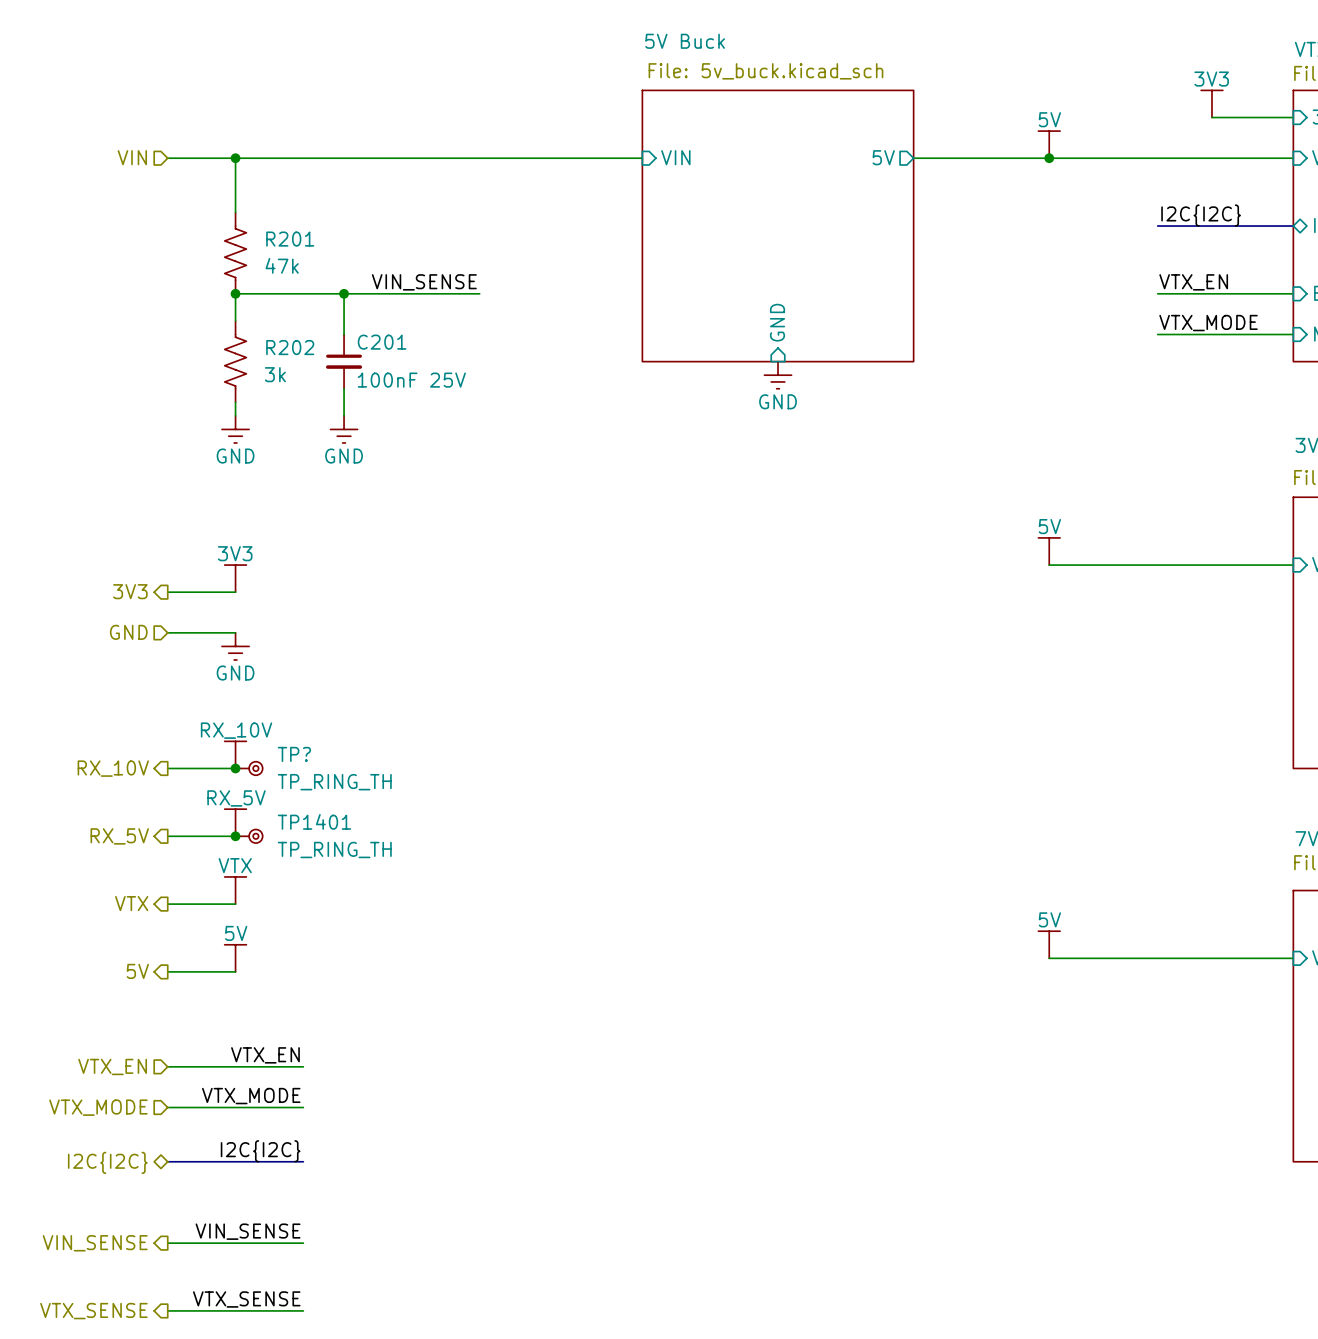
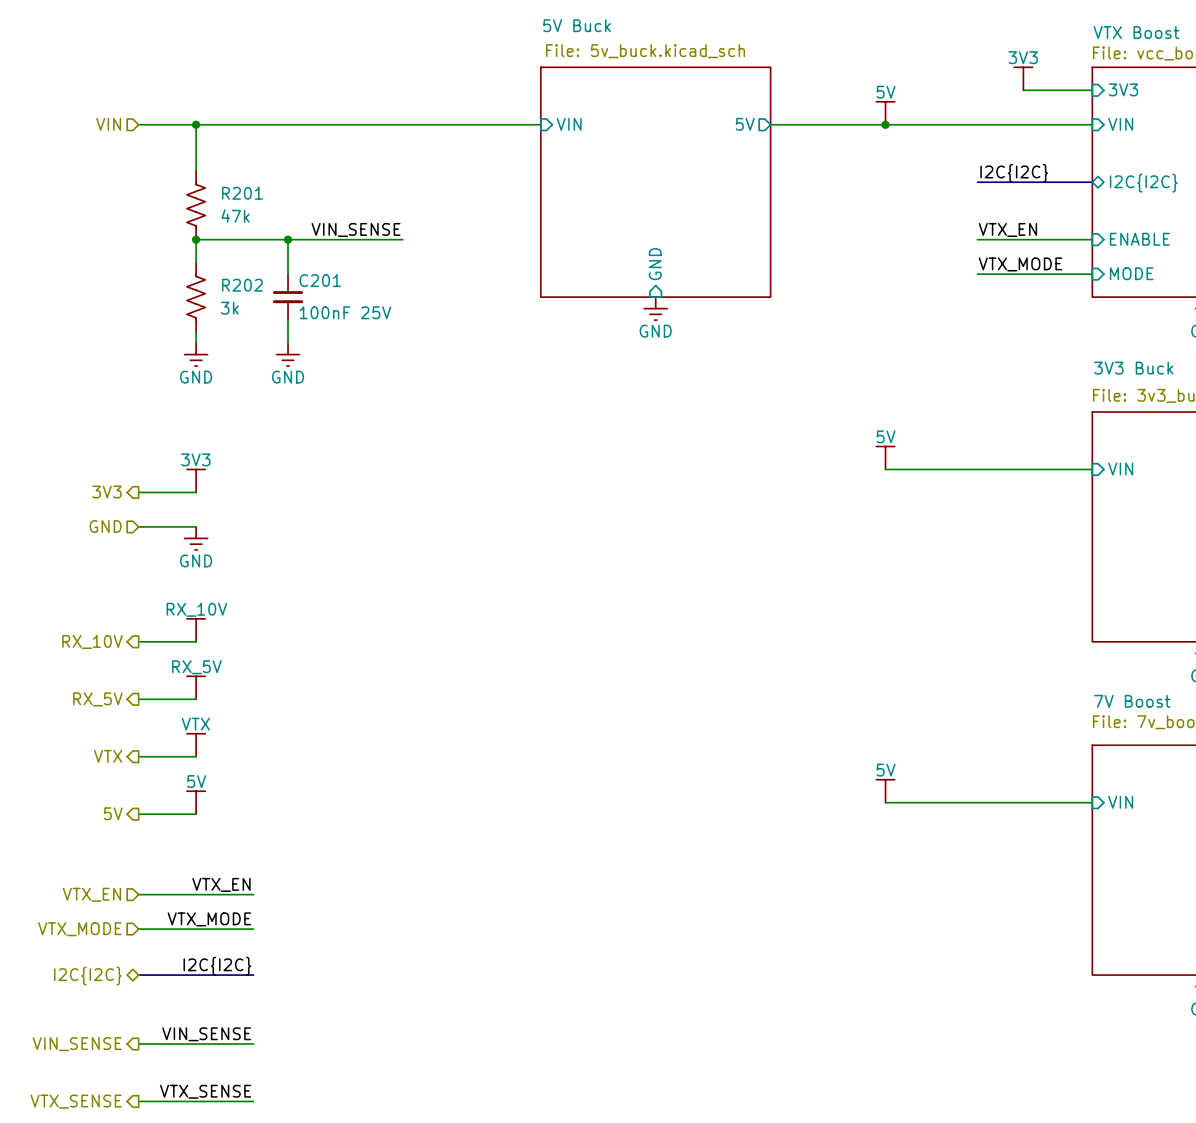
junction: (235, 768) -> none
TP?: TP_RING_TH (249, 768) -> none
junction: (235, 836) -> none
TP1401: TP_RING_TH (249, 836) -> none

